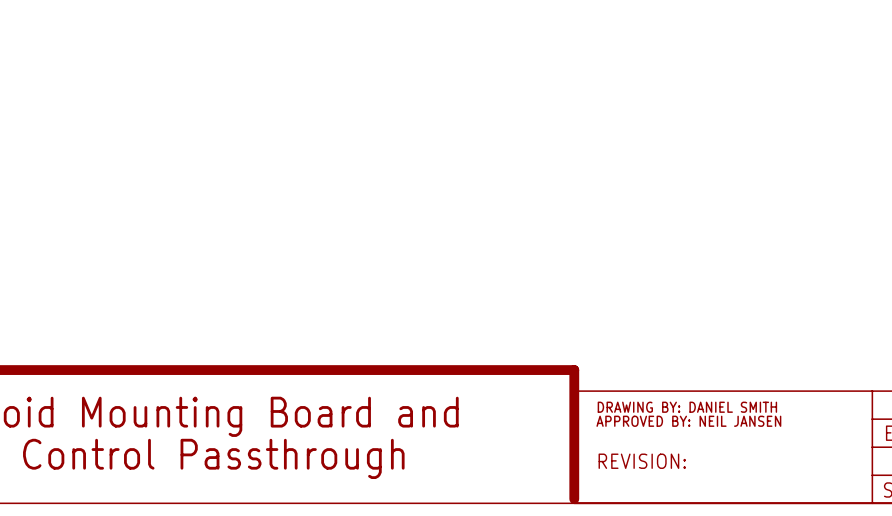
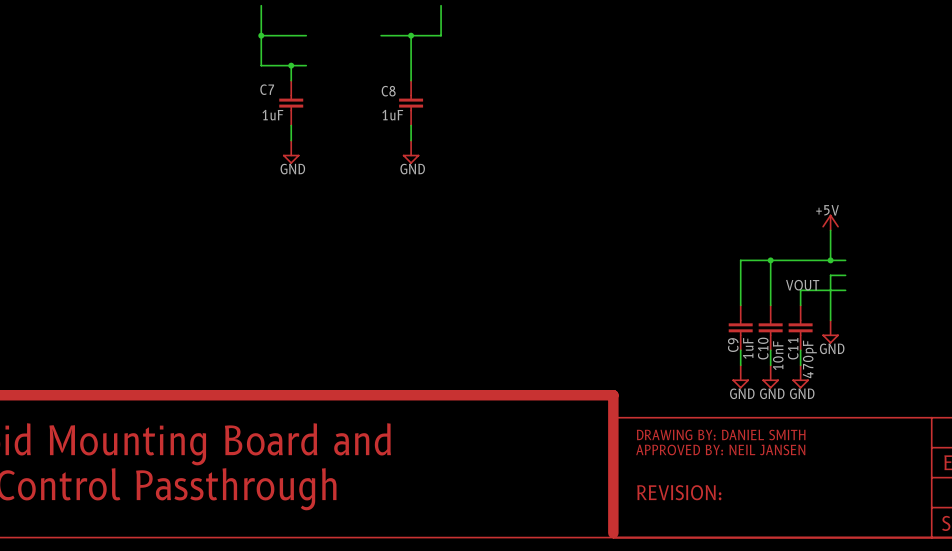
wire: none -> (261, 5) (261, 65) (306, 65)
wire: none -> (441, 5) (441, 35) (381, 35)
wire: none -> (261, 35) (306, 35)
junction: none -> (261, 35)
wire: none -> (411, 35) (411, 80)
junction: none -> (411, 35)
wire: none -> (291, 65) (291, 80)
junction: none -> (291, 65)
C7: none -> 1uF (291, 103)
C8: none -> 1uF (411, 103)
wire: none -> (291, 125) (291, 140)
wire: none -> (411, 125) (411, 140)
power symbol: none -> GND (291, 152)
power symbol: none -> GND (411, 152)
power symbol: none -> +5V (830, 222)
wire: none -> (830, 230) (830, 260)
wire: none -> (770, 260) (770, 305)
junction: none -> (770, 260)
junction: none -> (830, 260)
wire: none -> (845, 260) (740, 260) (740, 305)
wire: none -> (845, 275) (830, 275) (830, 320)
label: none -> VOUT (802, 285)
wire: none -> (845, 290) (800, 290) (800, 305)
C9: none -> 1uF (740, 327)
C10: none -> 10nF (770, 327)
C11: none -> 470pF (800, 327)
power symbol: none -> GND (830, 331)
wire: none -> (740, 350) (740, 365)
wire: none -> (770, 350) (770, 365)
wire: none -> (800, 350) (800, 365)
power symbol: none -> GND (740, 376)
power symbol: none -> GND (770, 376)
power symbol: none -> GND (800, 376)

